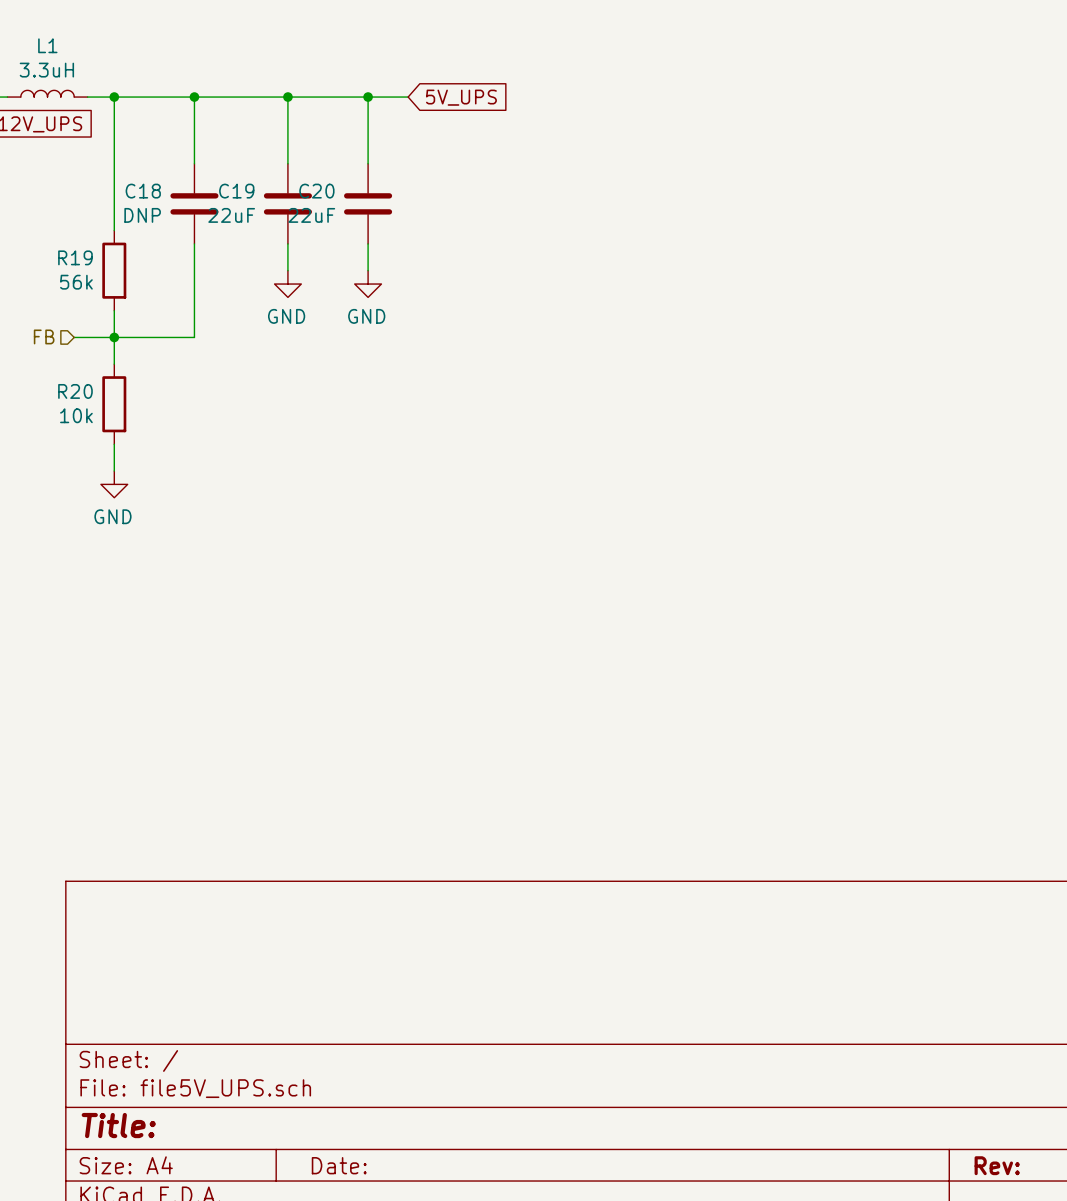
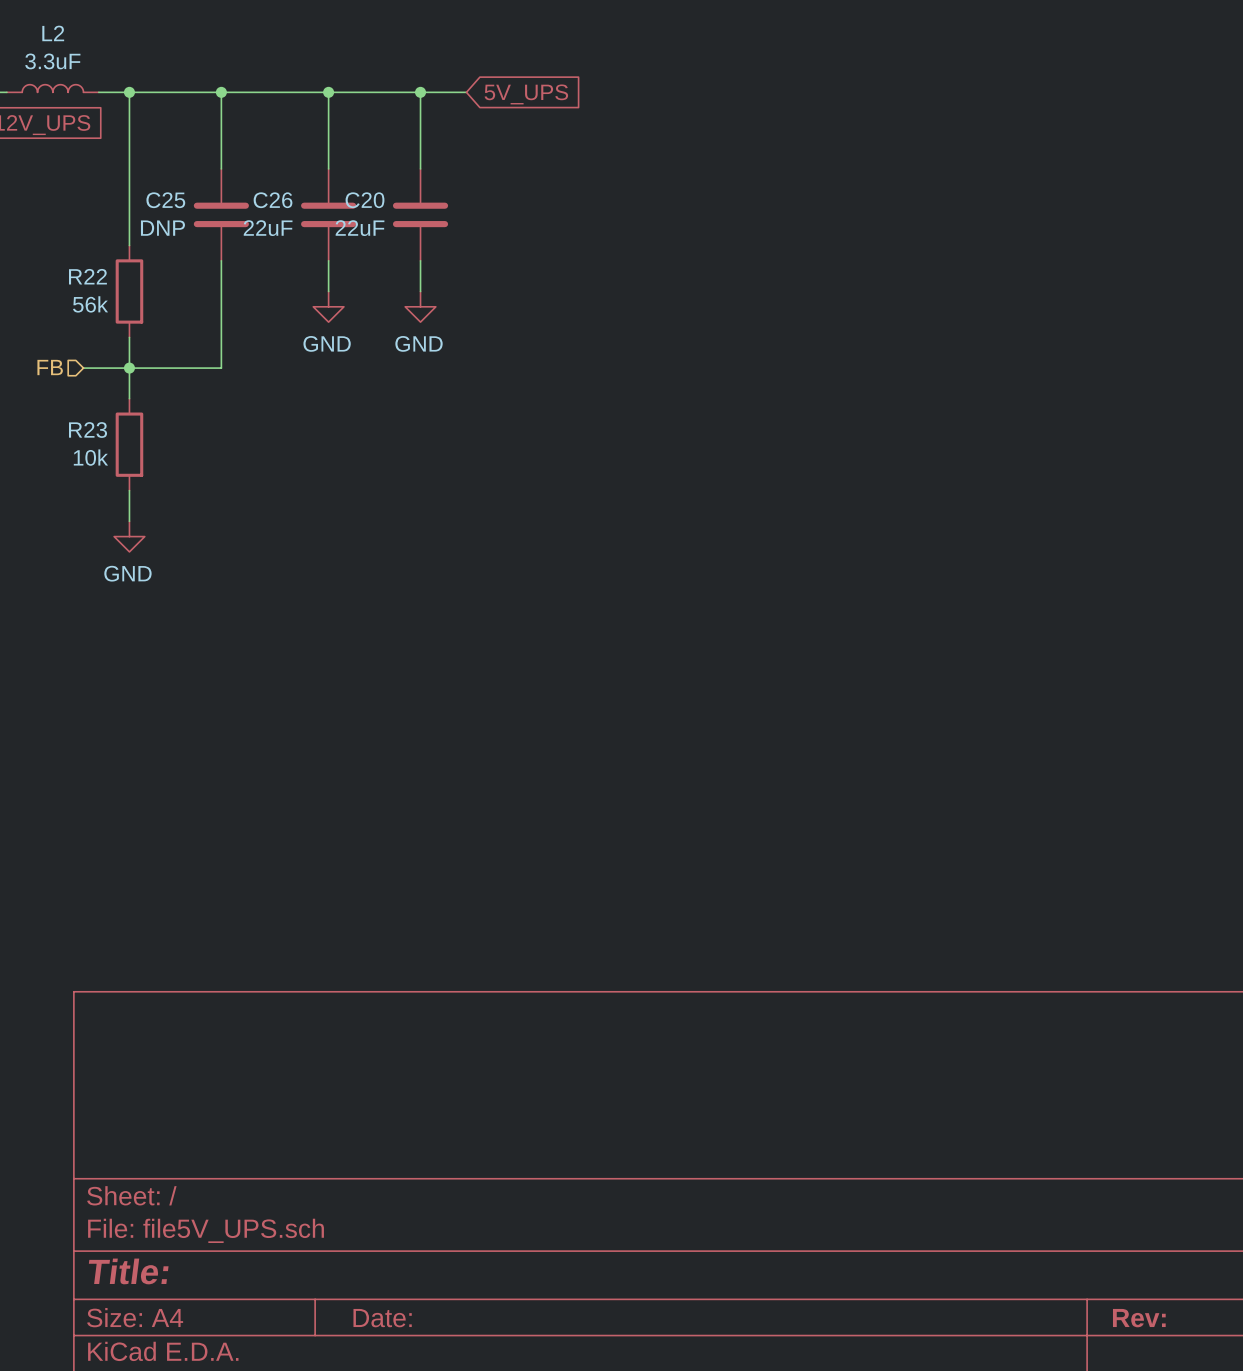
L1 name: L1 (47, 45) -> L2 (53, 33)
L1 value: 3.3uH (46, 70) -> 3.3uF (52, 61)
C18 name: C18 (143, 191) -> C25 (165, 200)
C19 name: C19 (236, 191) -> C26 (273, 200)
R19 name: R19 (75, 257) -> R22 (87, 276)
R20 name: R20 (75, 391) -> R23 (88, 430)

